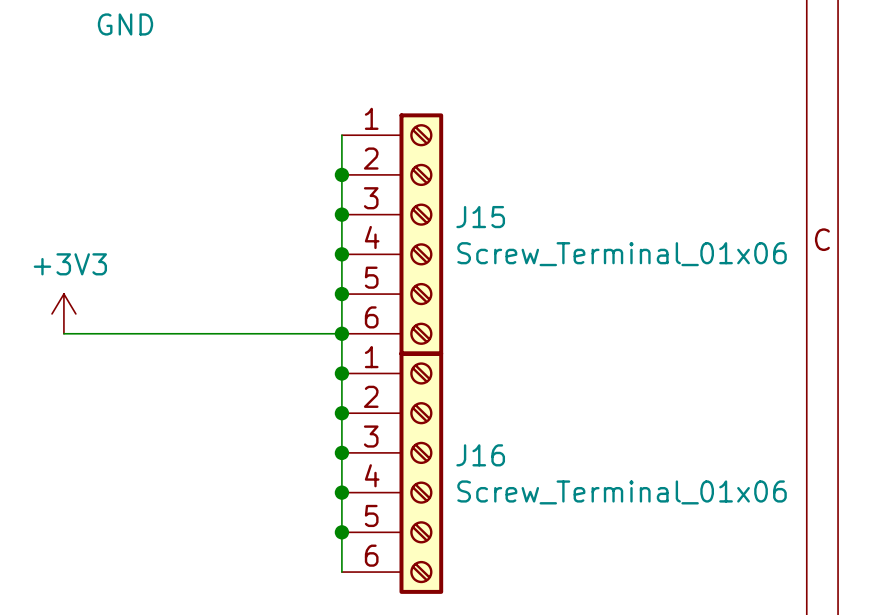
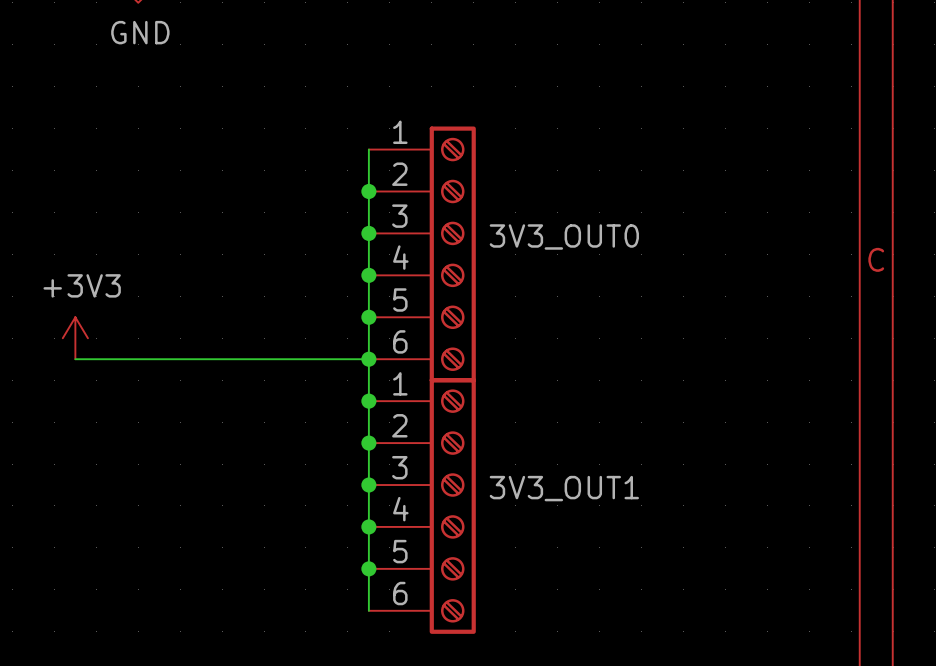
J15 name: J15 (480, 217) -> 3V3_OUT0 (564, 236)
J15 value: Screw_Terminal_01x06 (622, 254) -> none
J16 name: J16 (480, 455) -> 3V3_OUT1 (564, 488)
J16 value: Screw_Terminal_01x06 (622, 492) -> none

